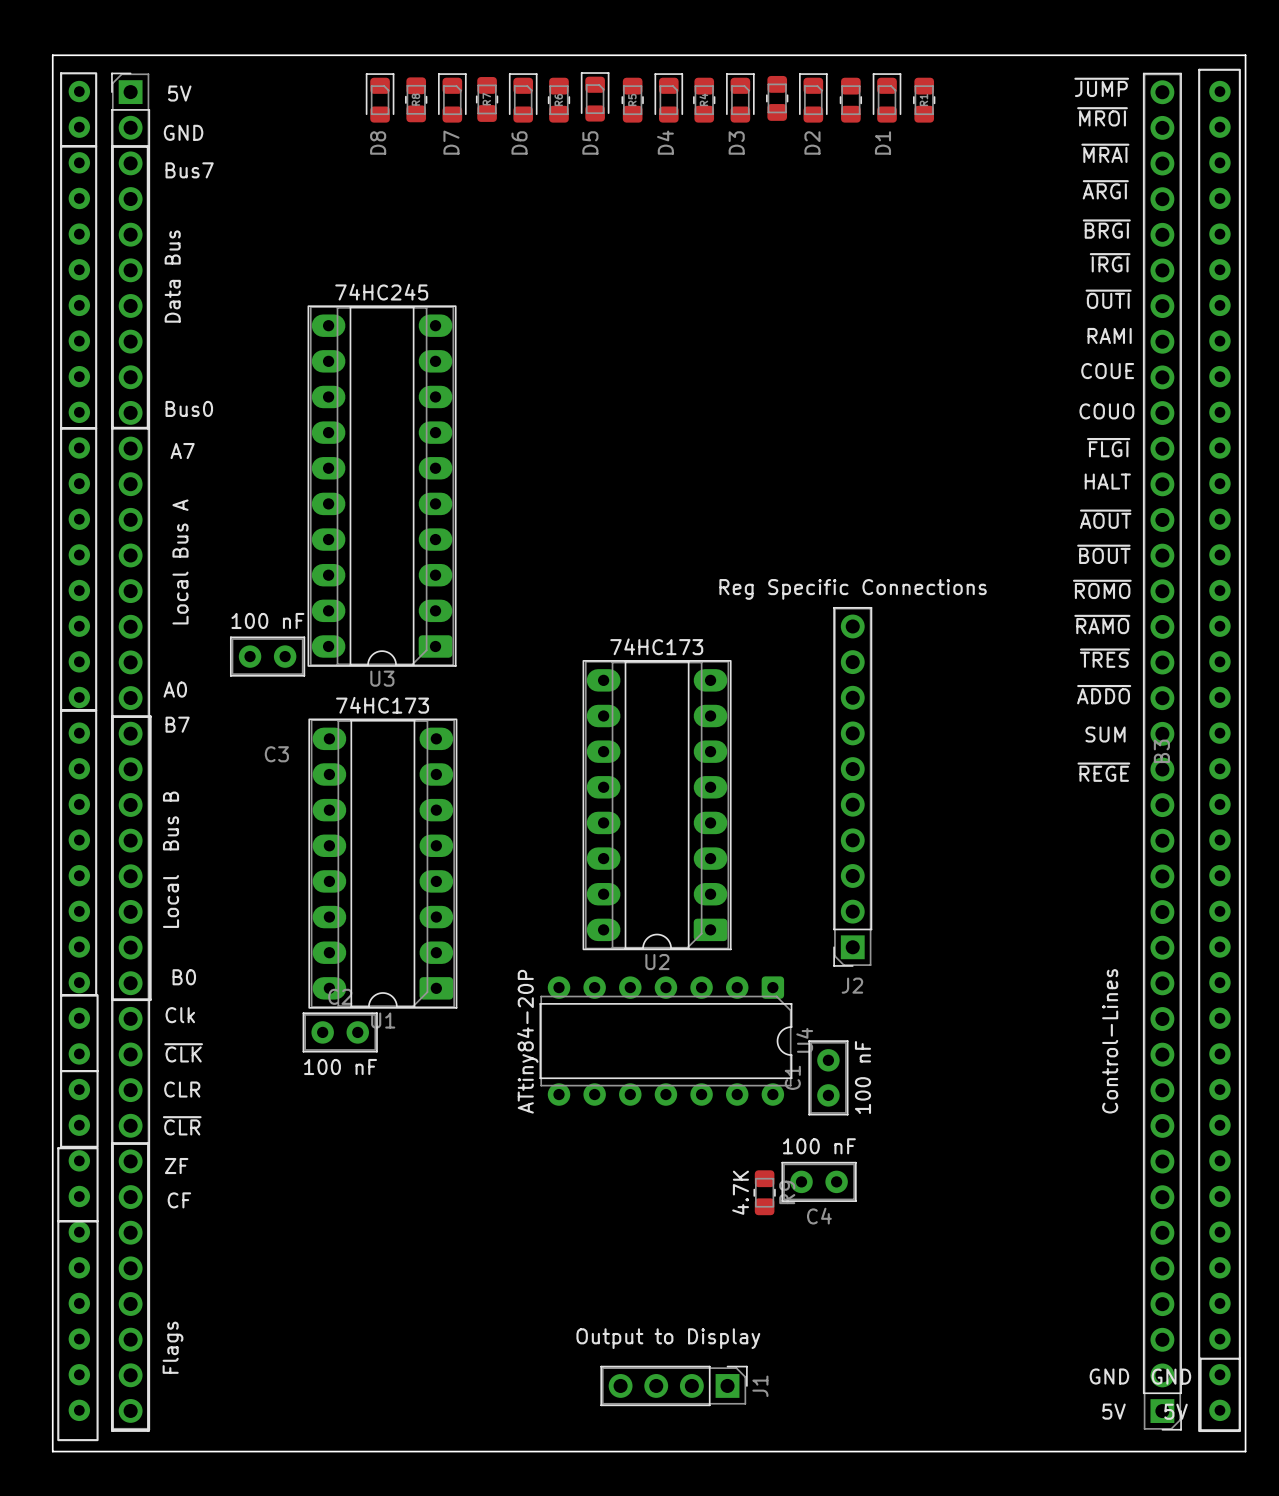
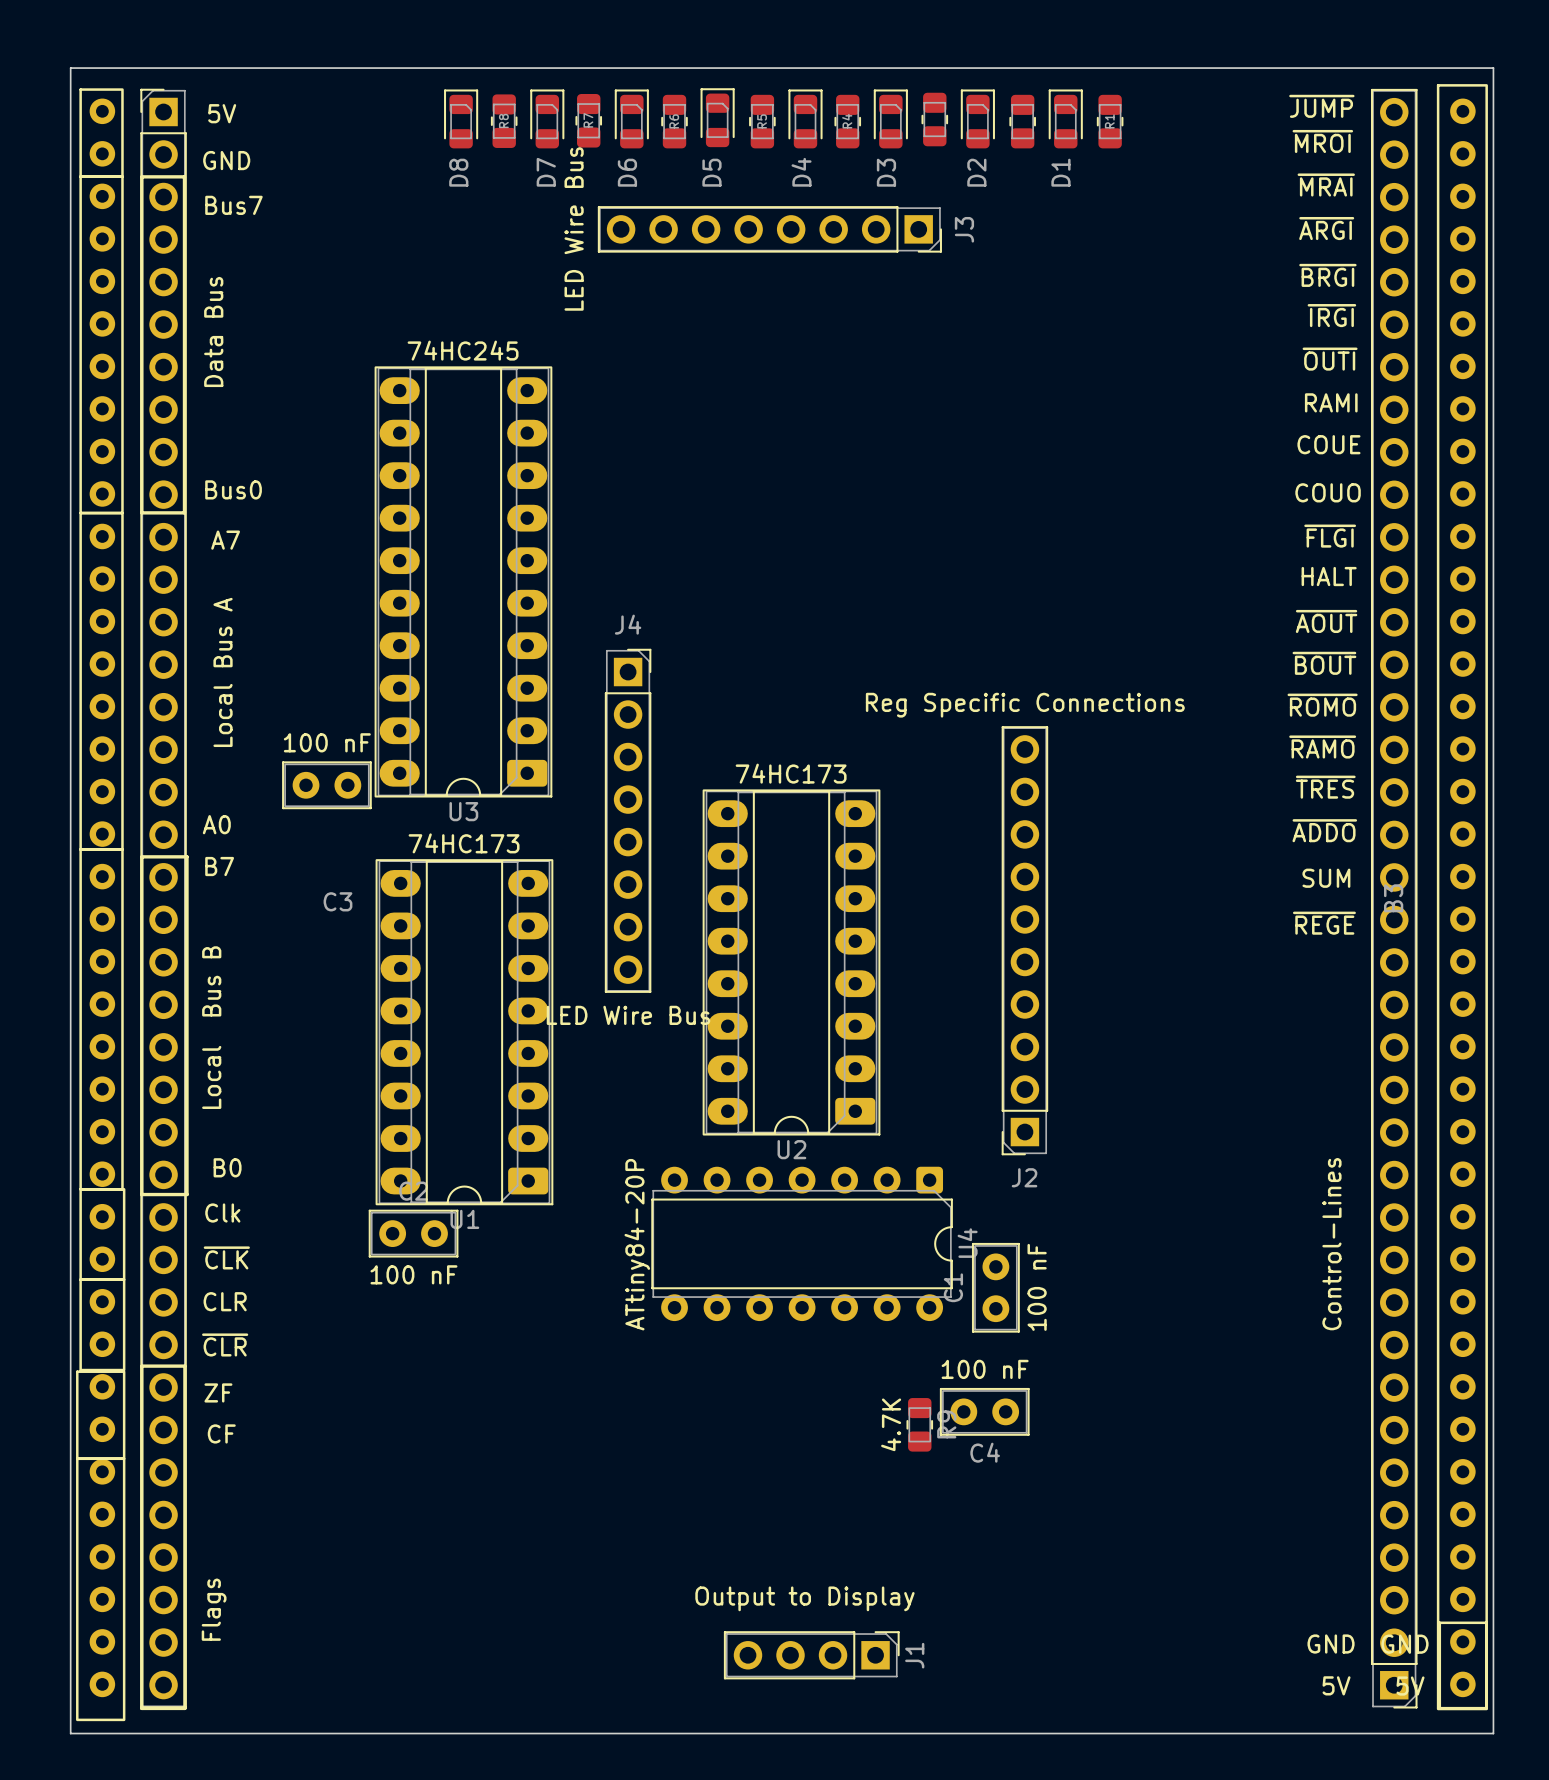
J3: none -> LED Wire Bus (769, 229)
J4: none -> LED Wire Bus (628, 820)

